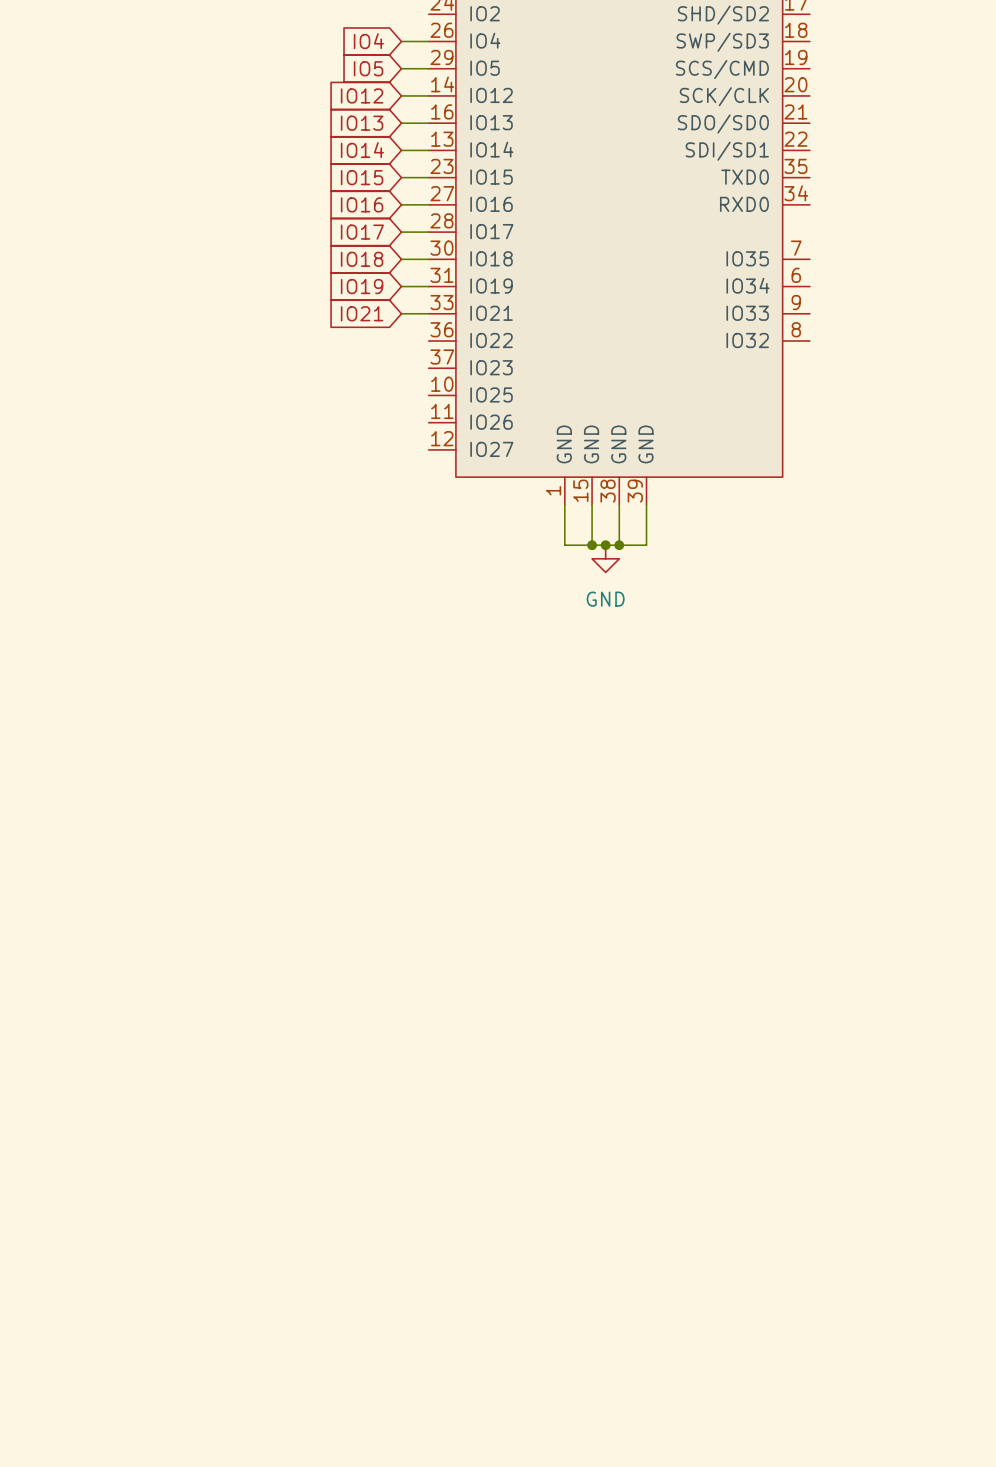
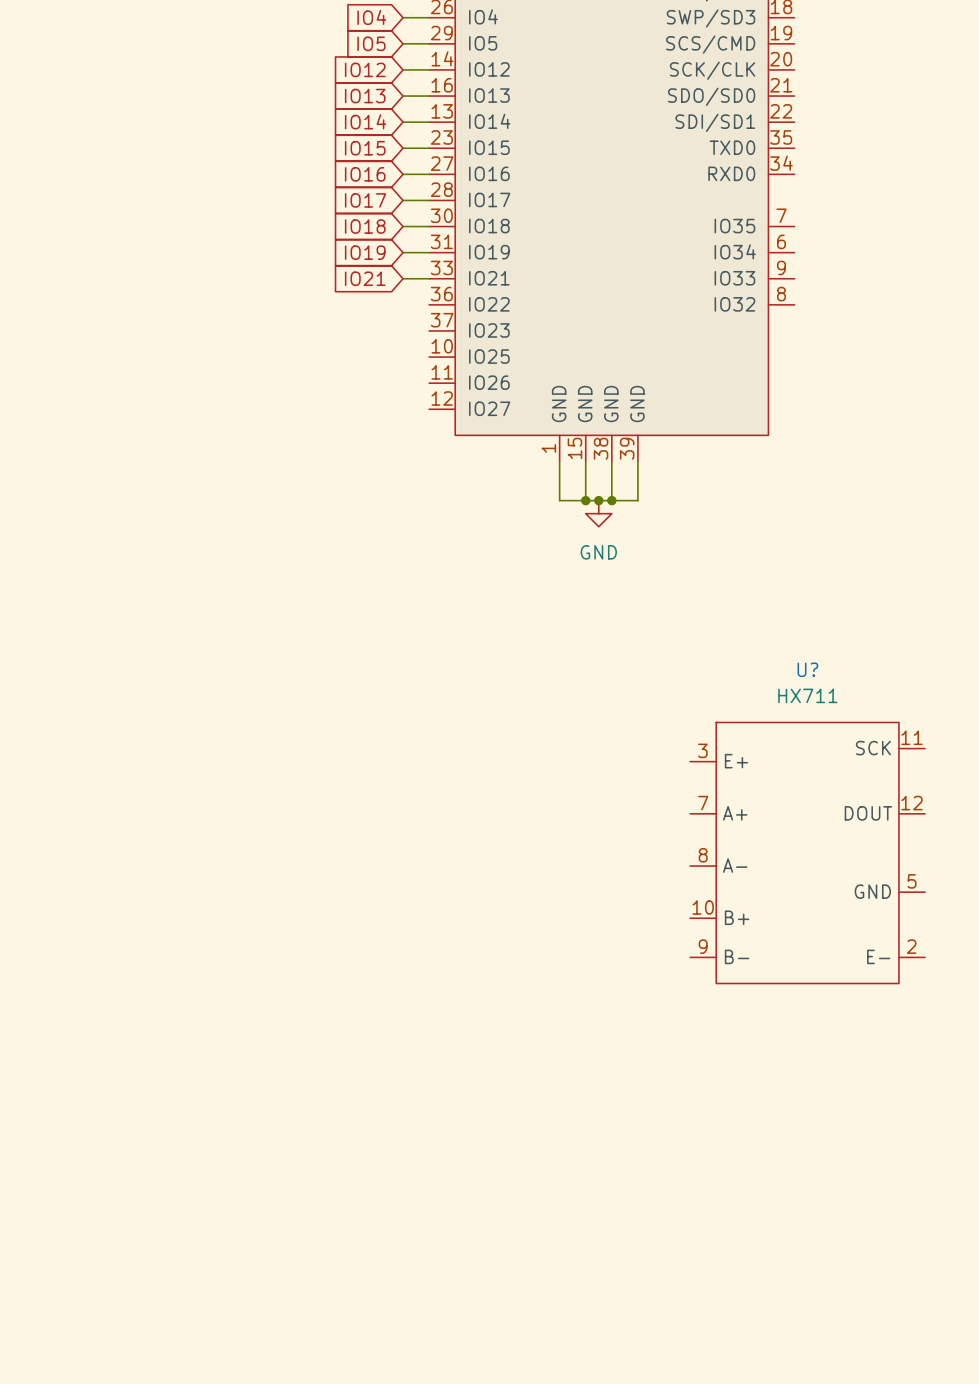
U?: none -> HX711 (807, 853)

